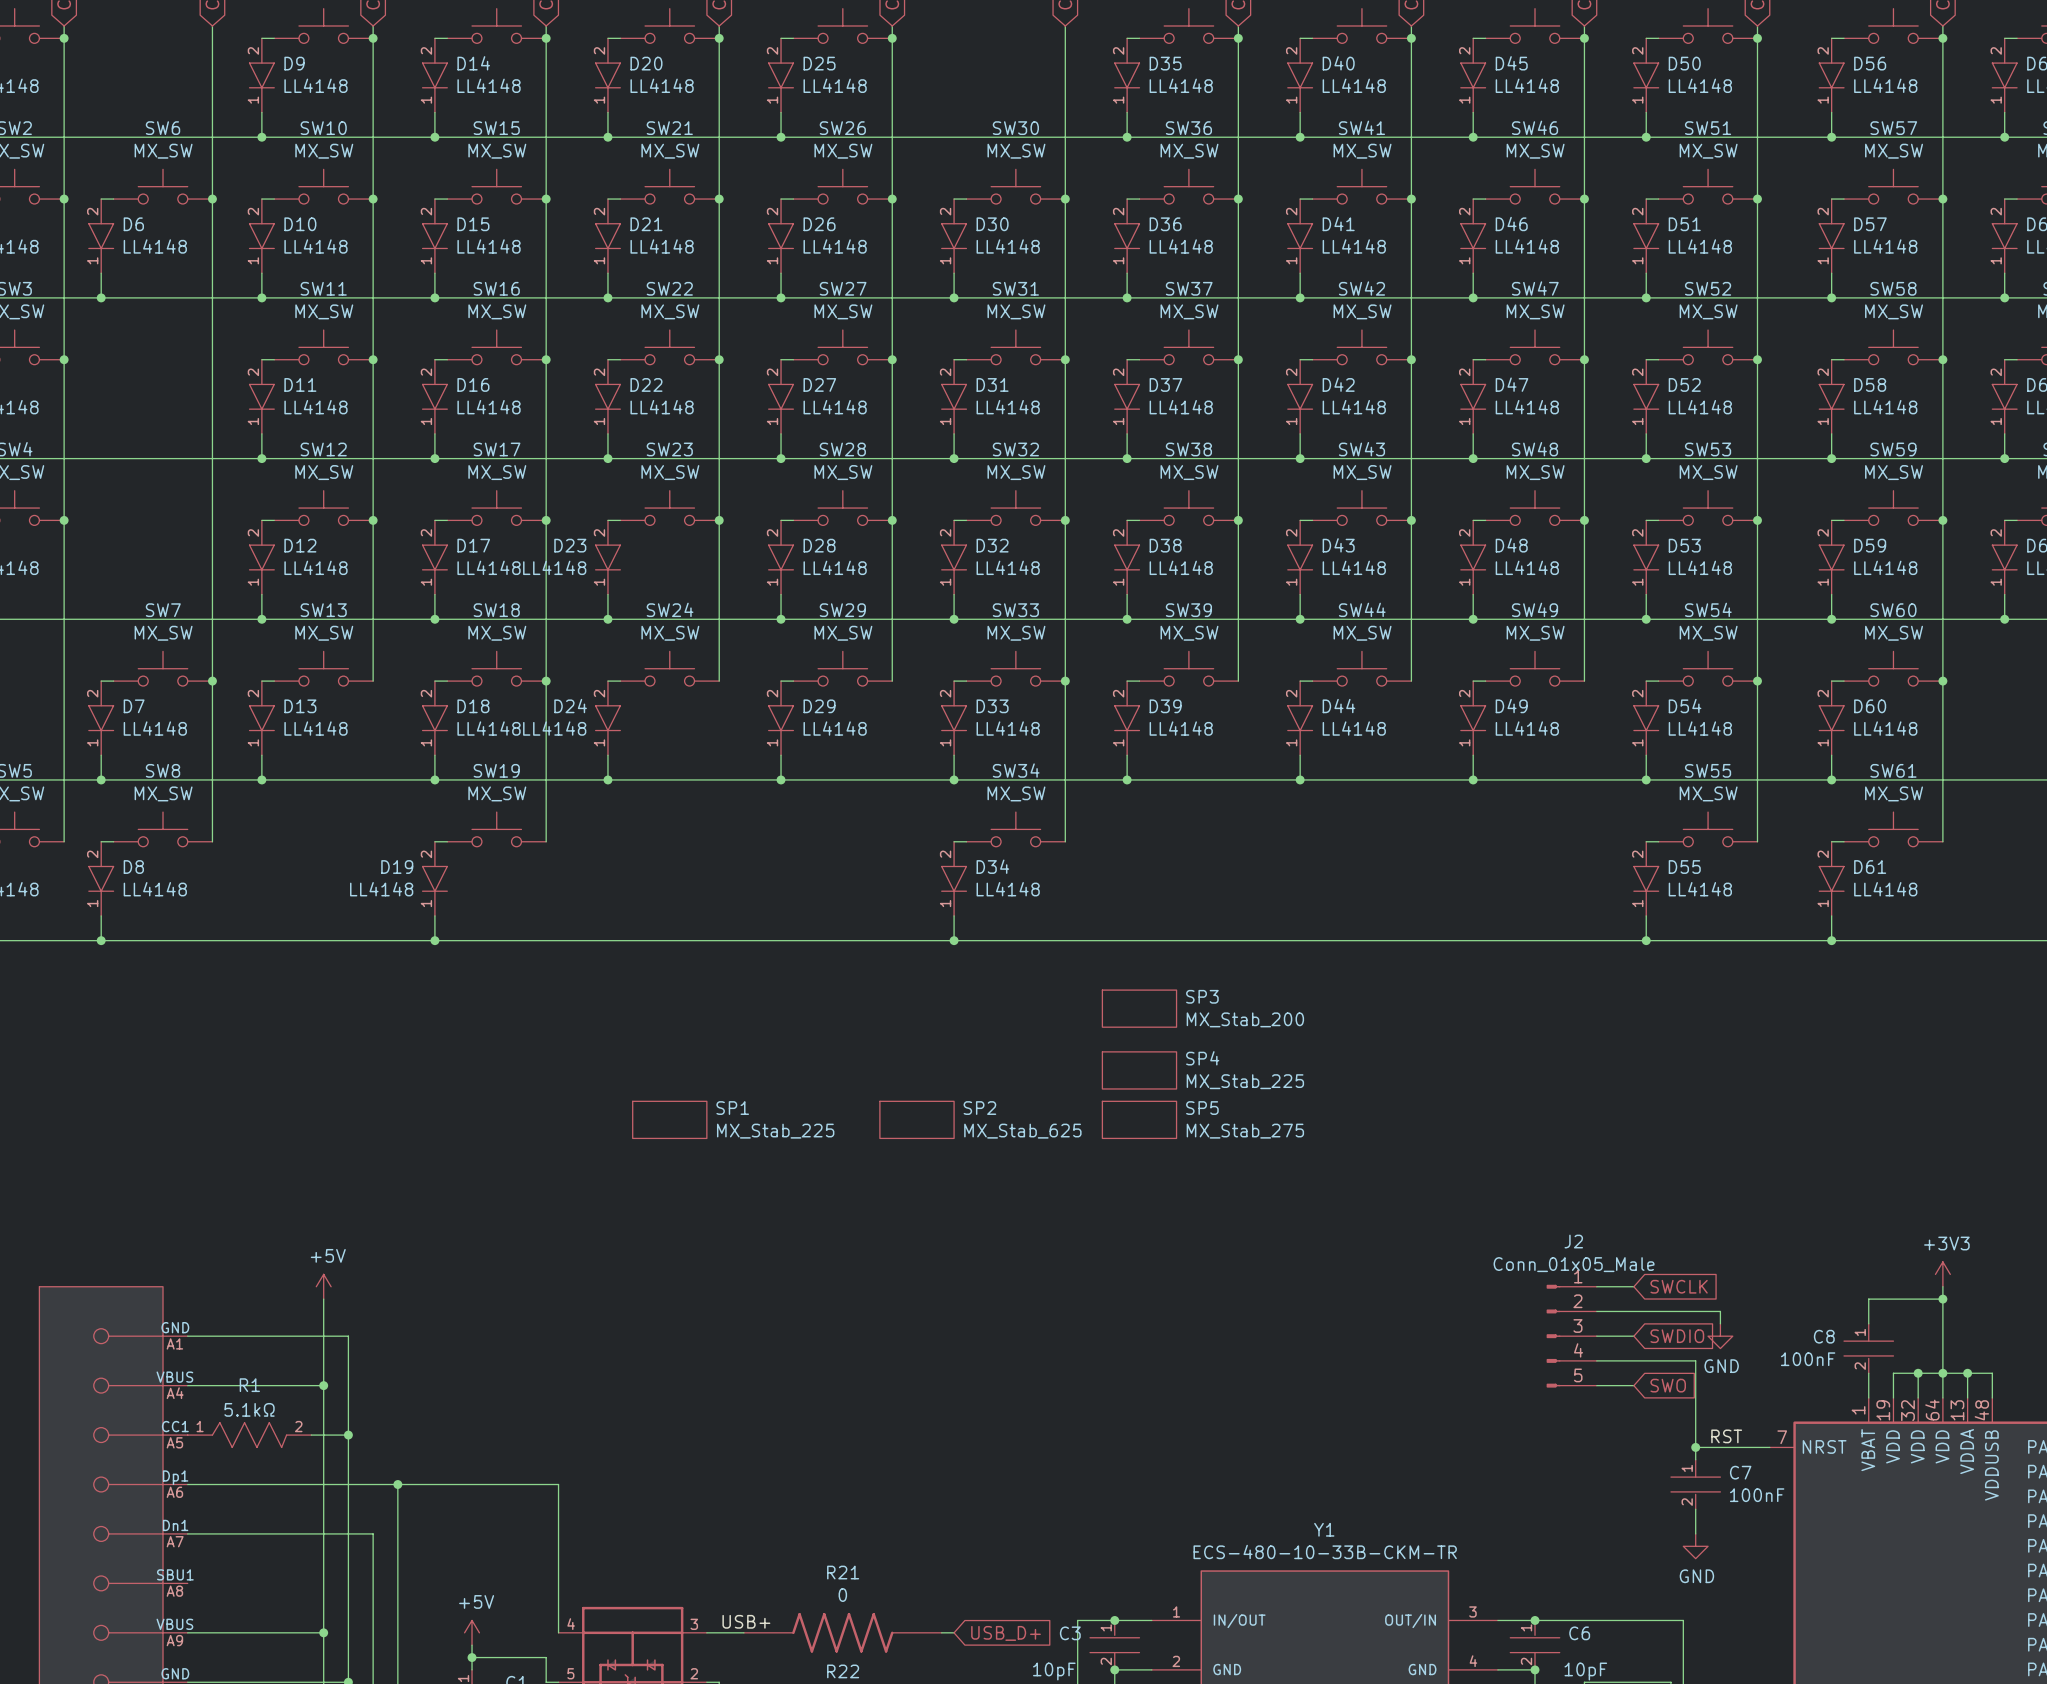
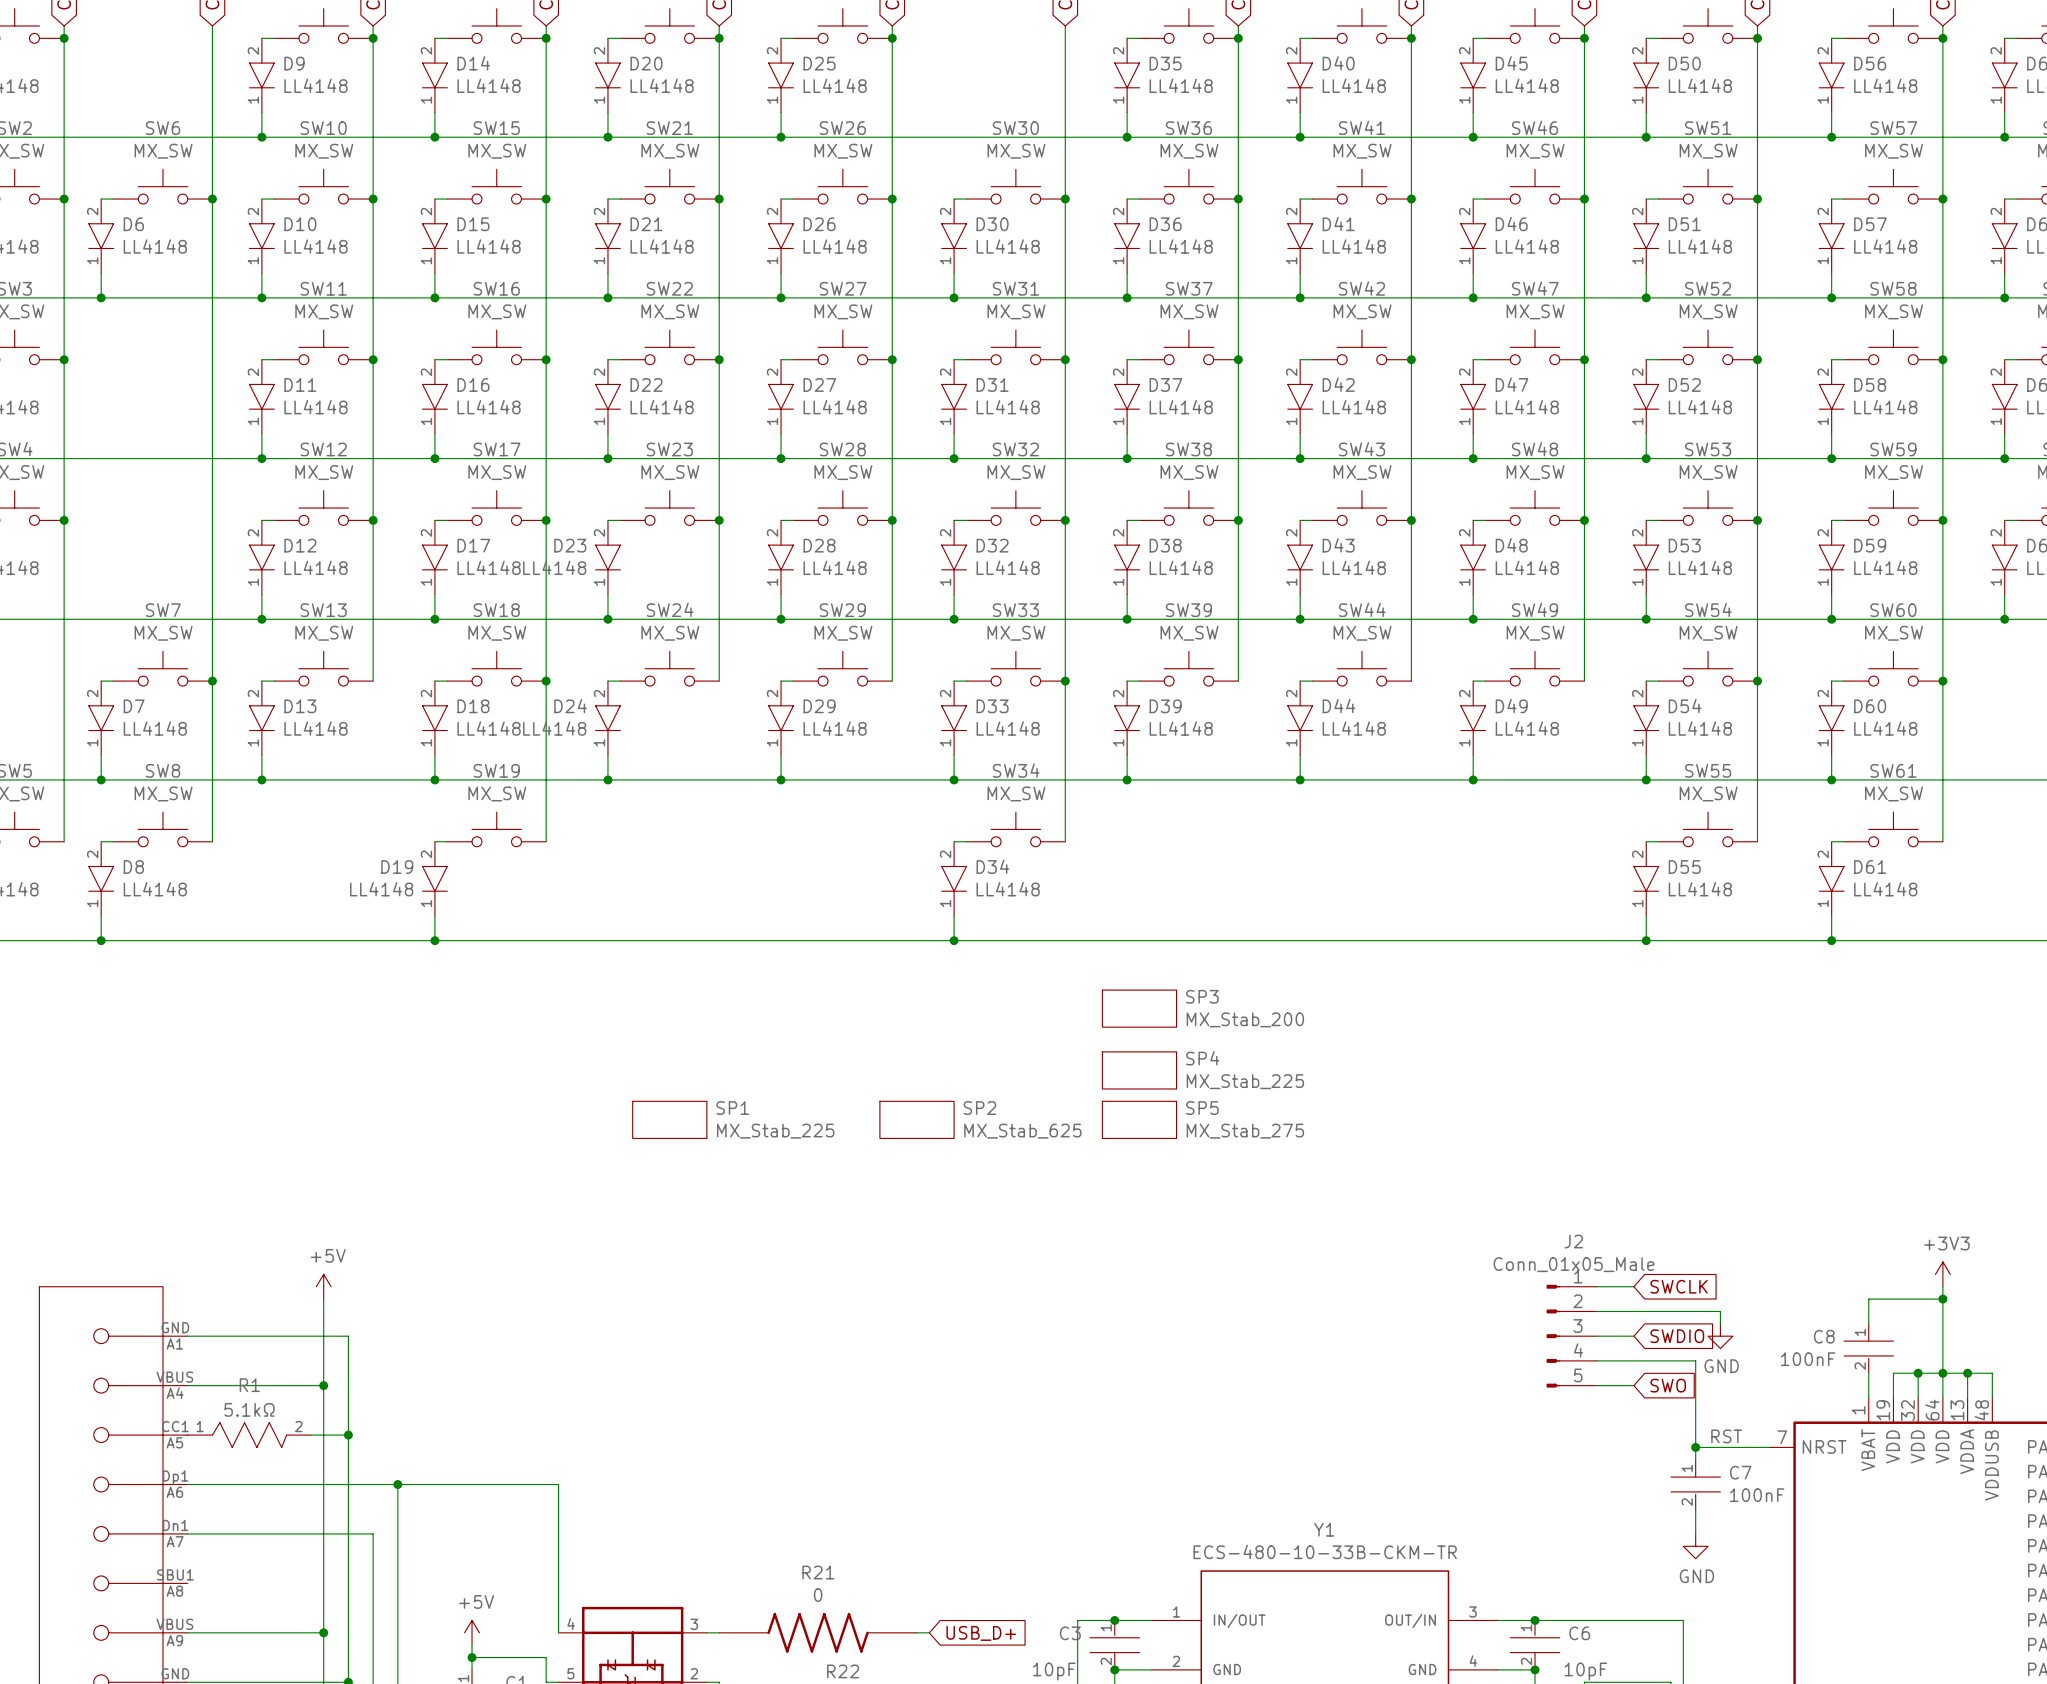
label: USB+ (746, 1621) -> none
R21 position: (842, 1632) -> (818, 1632)
global label position: USB_D+ (1006, 1633) -> USB_D+ (981, 1633)

